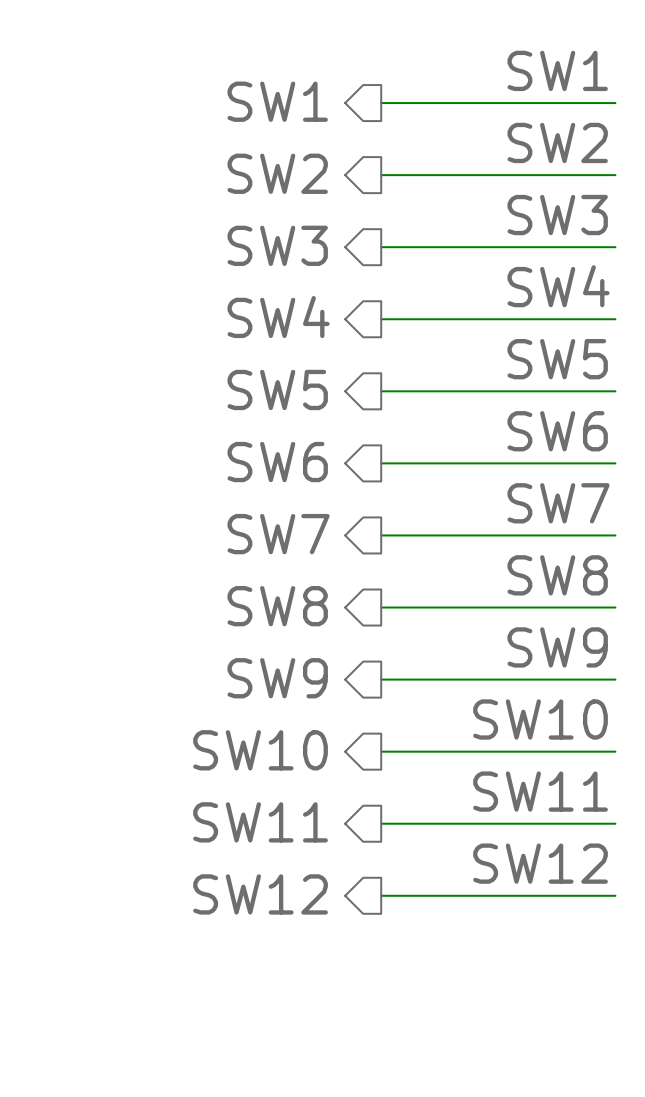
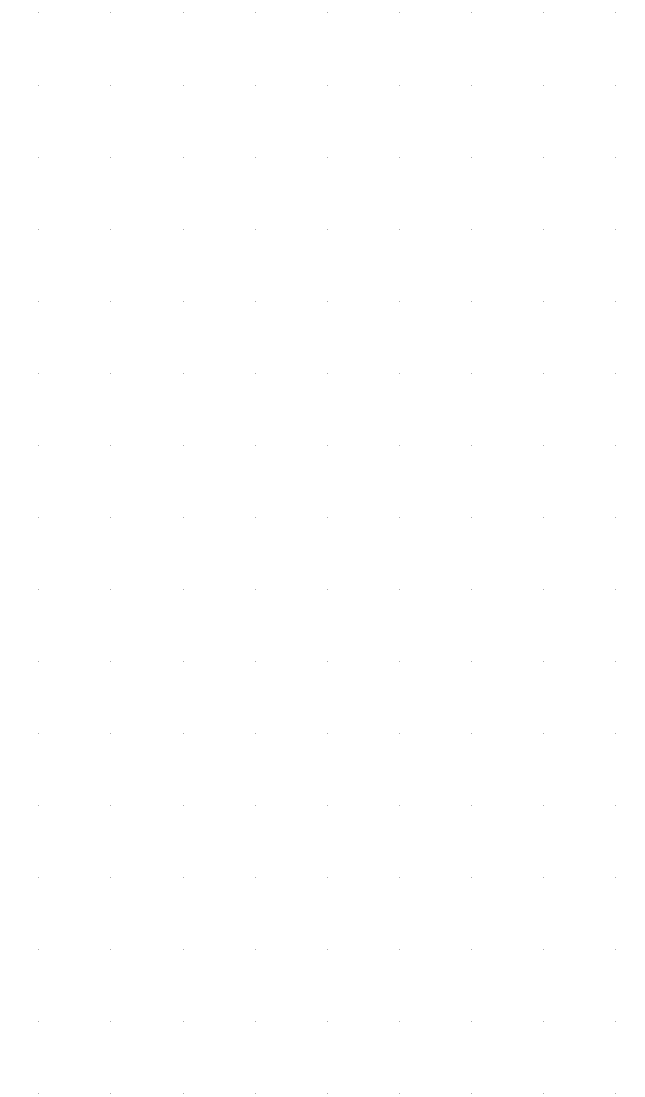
label: SW1 (557, 70) -> none
hierarchical label: SW1 (277, 101) -> none
wire: (381, 103) (615, 103) -> none
label: SW2 (557, 142) -> none
hierarchical label: SW2 (277, 173) -> none
wire: (381, 175) (615, 175) -> none
label: SW3 (557, 215) -> none
hierarchical label: SW3 (277, 245) -> none
wire: (381, 247) (615, 247) -> none
label: SW4 (558, 286) -> none
hierarchical label: SW4 (278, 317) -> none
wire: (381, 319) (615, 319) -> none
label: SW5 (557, 359) -> none
hierarchical label: SW5 (277, 389) -> none
wire: (381, 391) (615, 391) -> none
label: SW6 (557, 431) -> none
hierarchical label: SW6 (277, 462) -> none
wire: (381, 463) (615, 463) -> none
label: SW7 (558, 503) -> none
hierarchical label: SW7 (278, 534) -> none
wire: (381, 535) (615, 535) -> none
label: SW8 (557, 575) -> none
hierarchical label: SW8 (277, 606) -> none
wire: (381, 607) (615, 607) -> none
label: SW9 (557, 647) -> none
hierarchical label: SW9 (277, 678) -> none
wire: (381, 679) (615, 679) -> none
label: SW10 (540, 719) -> none
hierarchical label: SW10 (260, 750) -> none
wire: (381, 751) (615, 751) -> none
label: SW11 (540, 791) -> none
hierarchical label: SW11 (260, 822) -> none
wire: (381, 823) (615, 823) -> none
label: SW12 (540, 863) -> none
hierarchical label: SW12 (260, 894) -> none
wire: (381, 895) (615, 895) -> none

